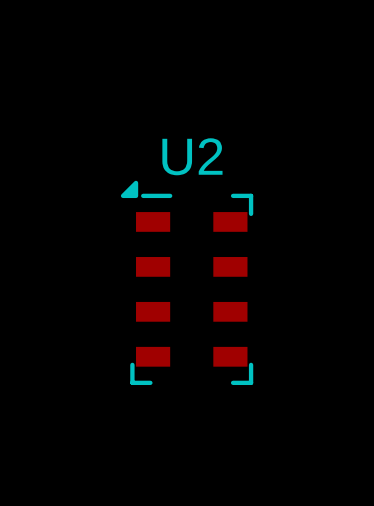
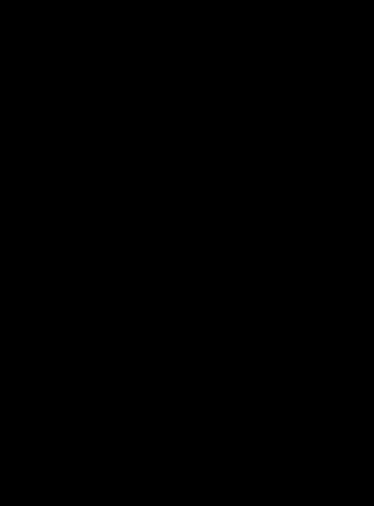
U2: (187, 282) -> none

